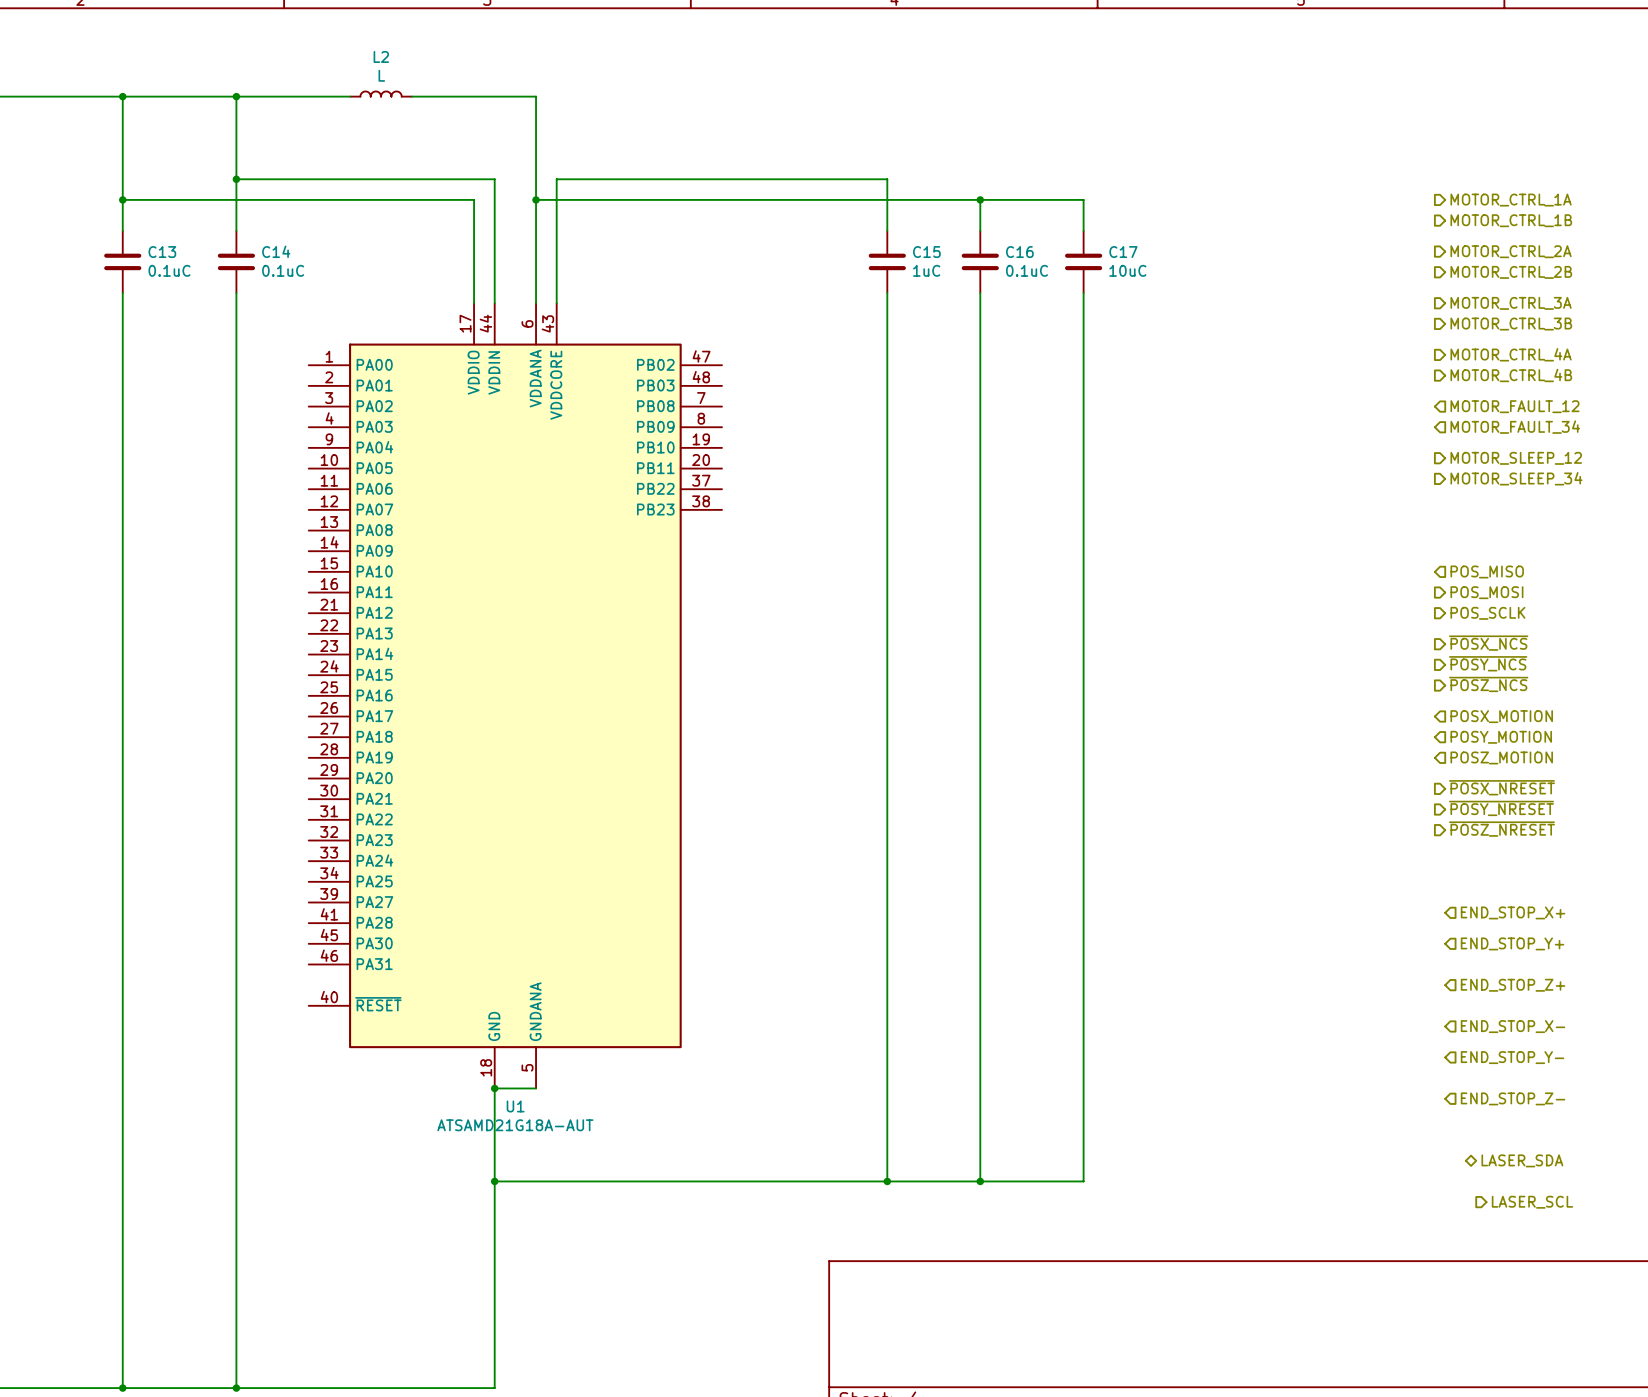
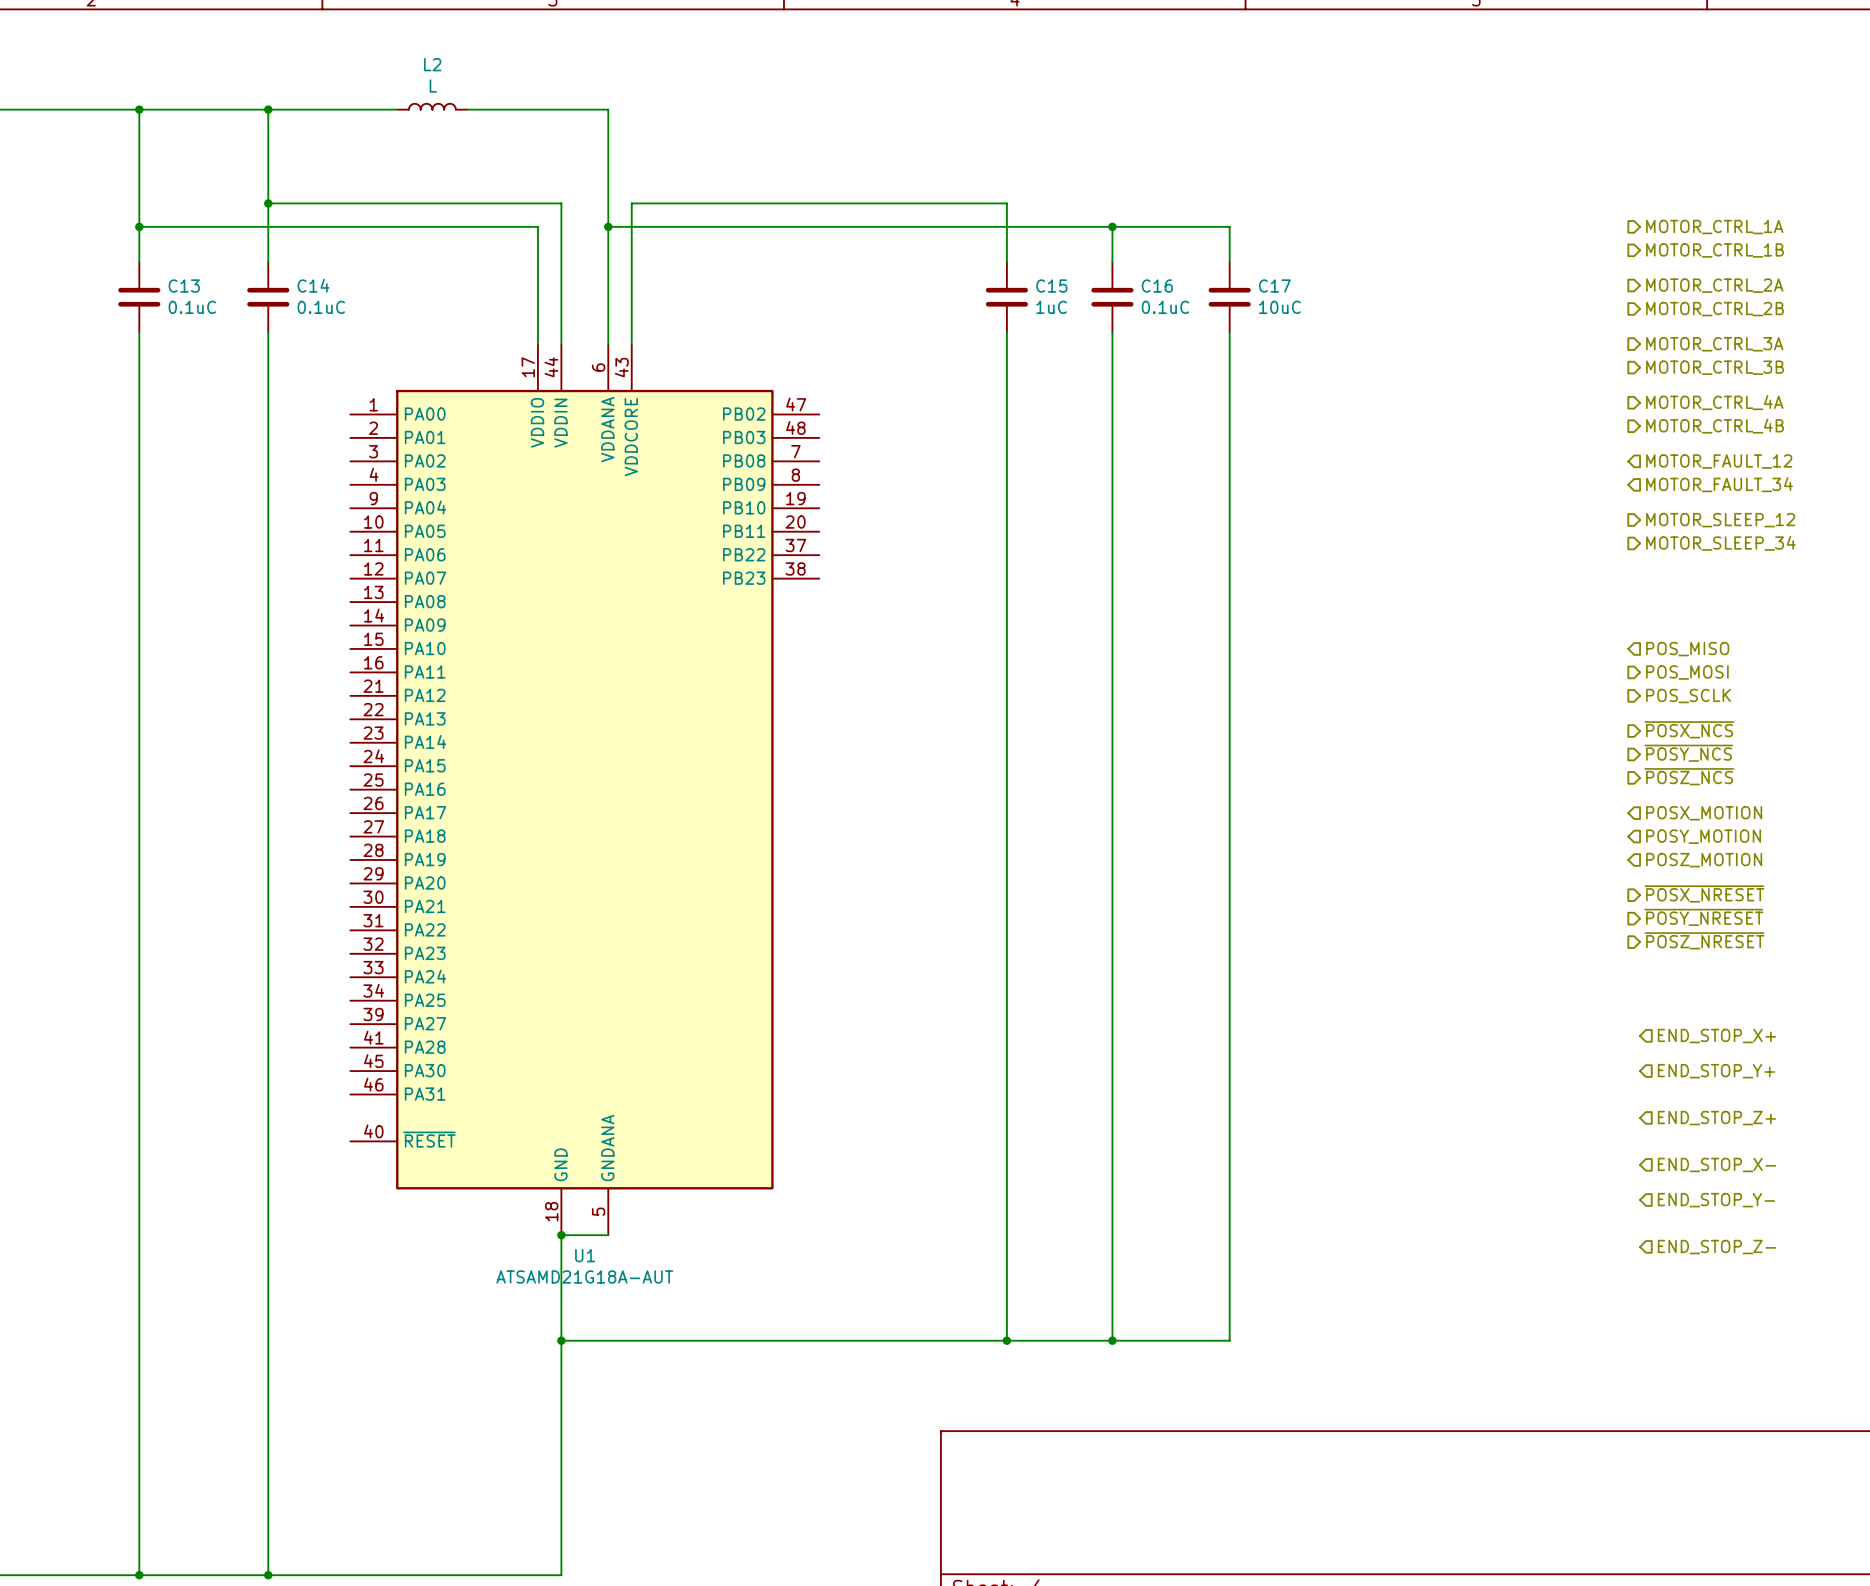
hierarchical label: LASER_SDA (1522, 1160) -> none
hierarchical label: LASER_SCL (1532, 1202) -> none

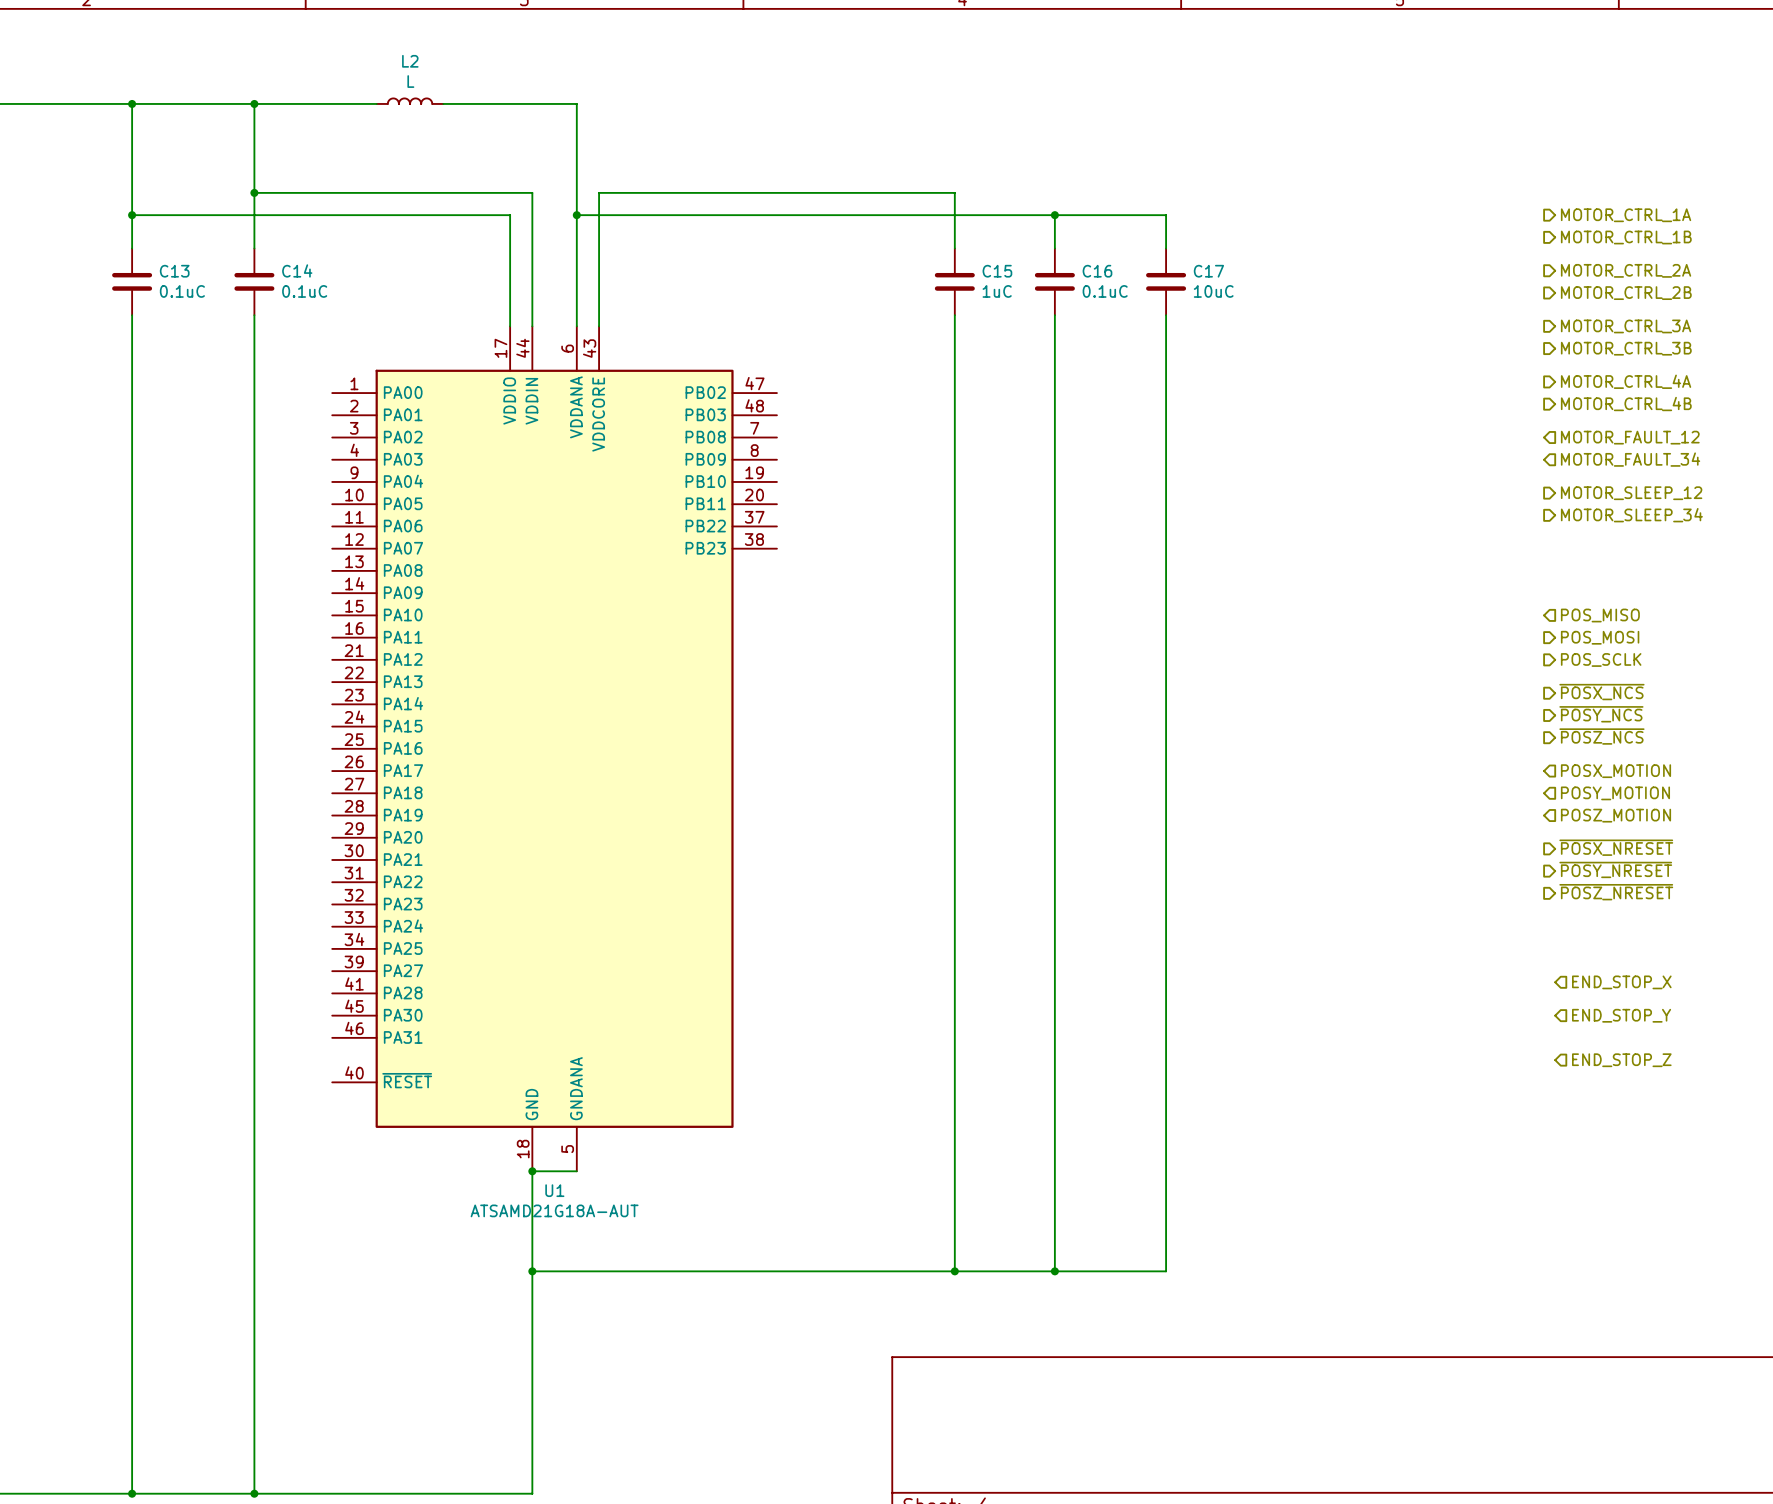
hierarchical label: END_STOP_X+ (1716, 1035) -> END_STOP_X (1621, 982)
hierarchical label: END_STOP_Y+ (1716, 1071) -> END_STOP_Y (1621, 1015)
hierarchical label: END_STOP_Z+ (1716, 1118) -> END_STOP_Z (1621, 1060)
hierarchical label: END_STOP_X- (1716, 1164) -> none
hierarchical label: END_STOP_Y- (1716, 1200) -> none
hierarchical label: END_STOP_Z- (1716, 1247) -> none

